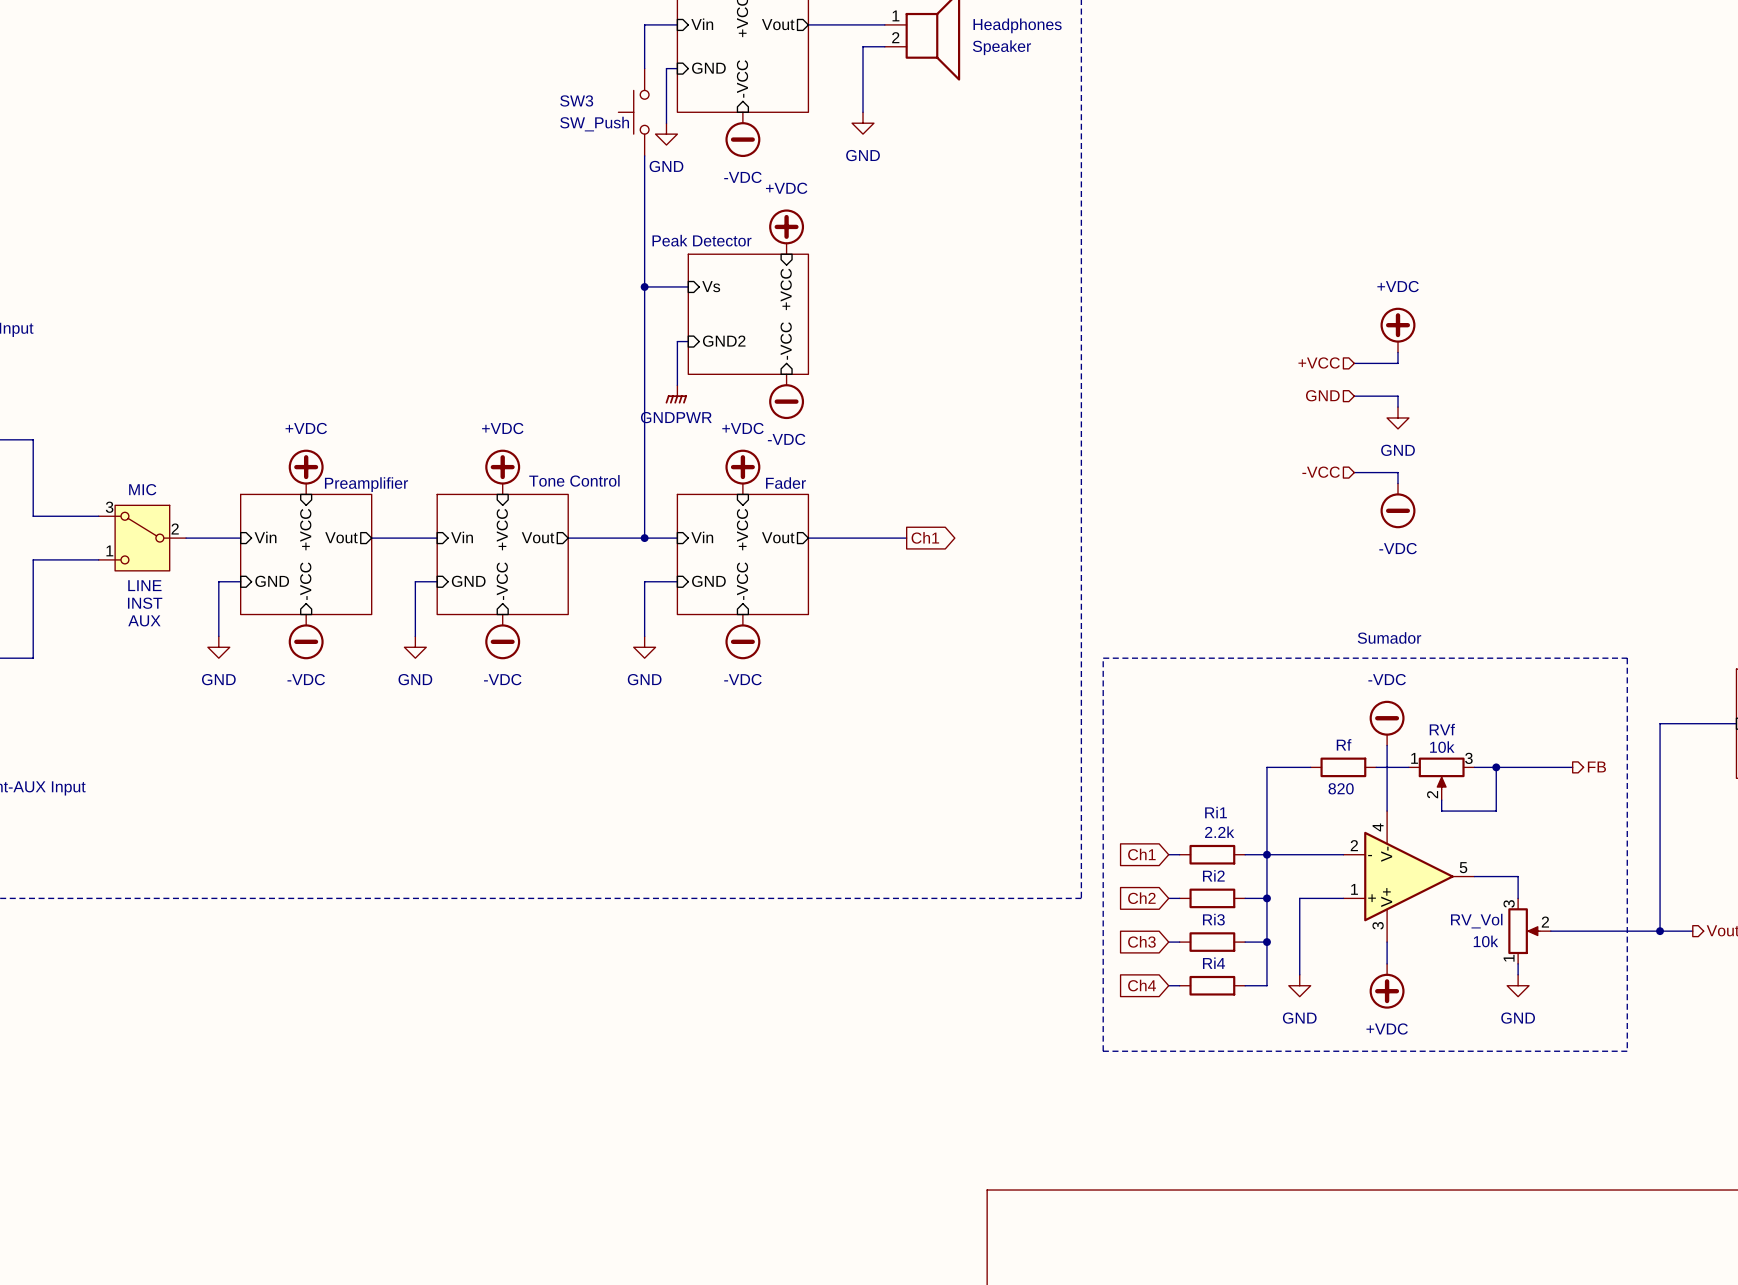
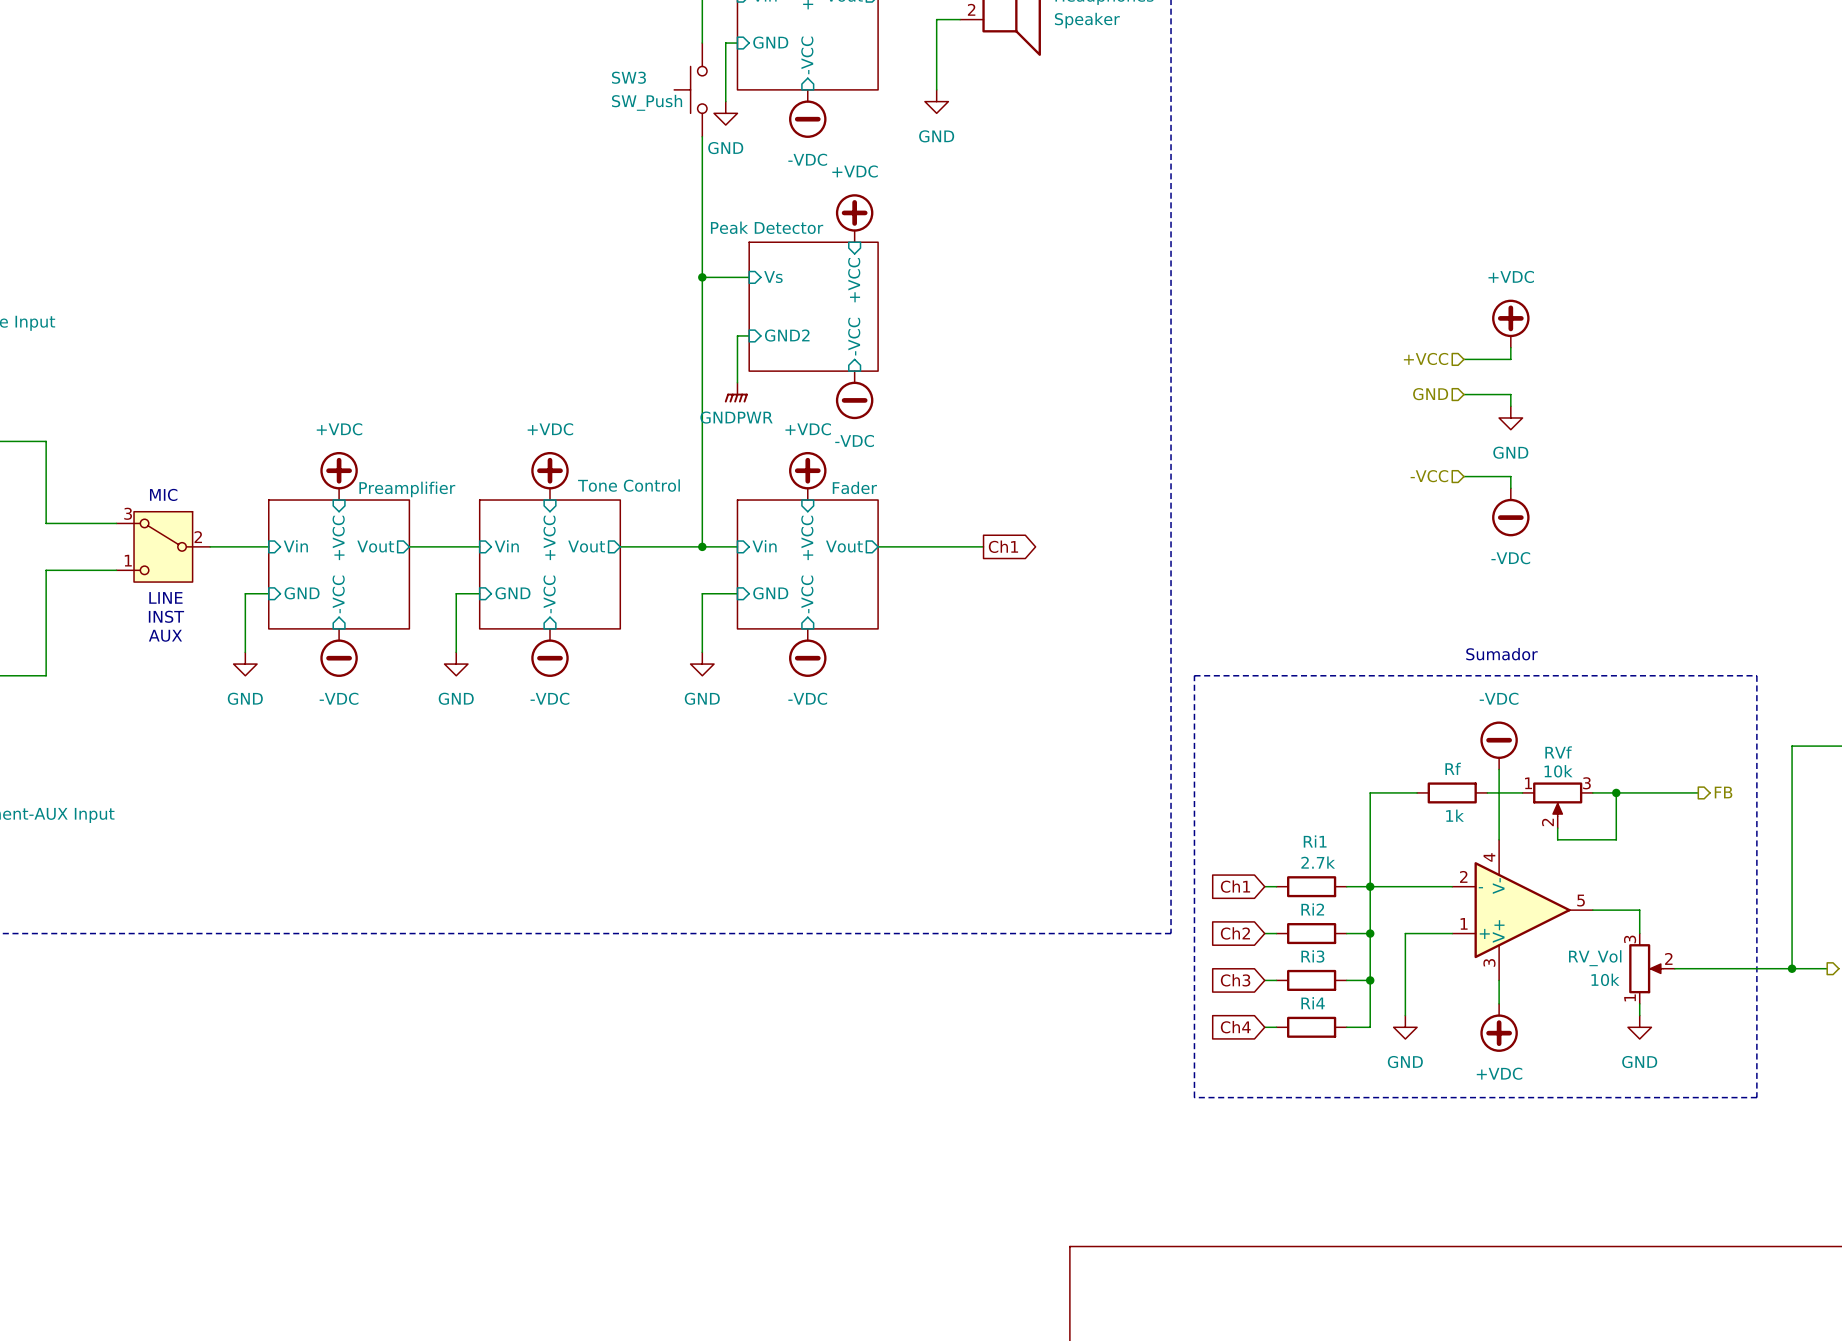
Rf value: 820 (1341, 788) -> 1k (1455, 815)
Ri1 value: 2.2k (1219, 832) -> 2.7k (1318, 862)

